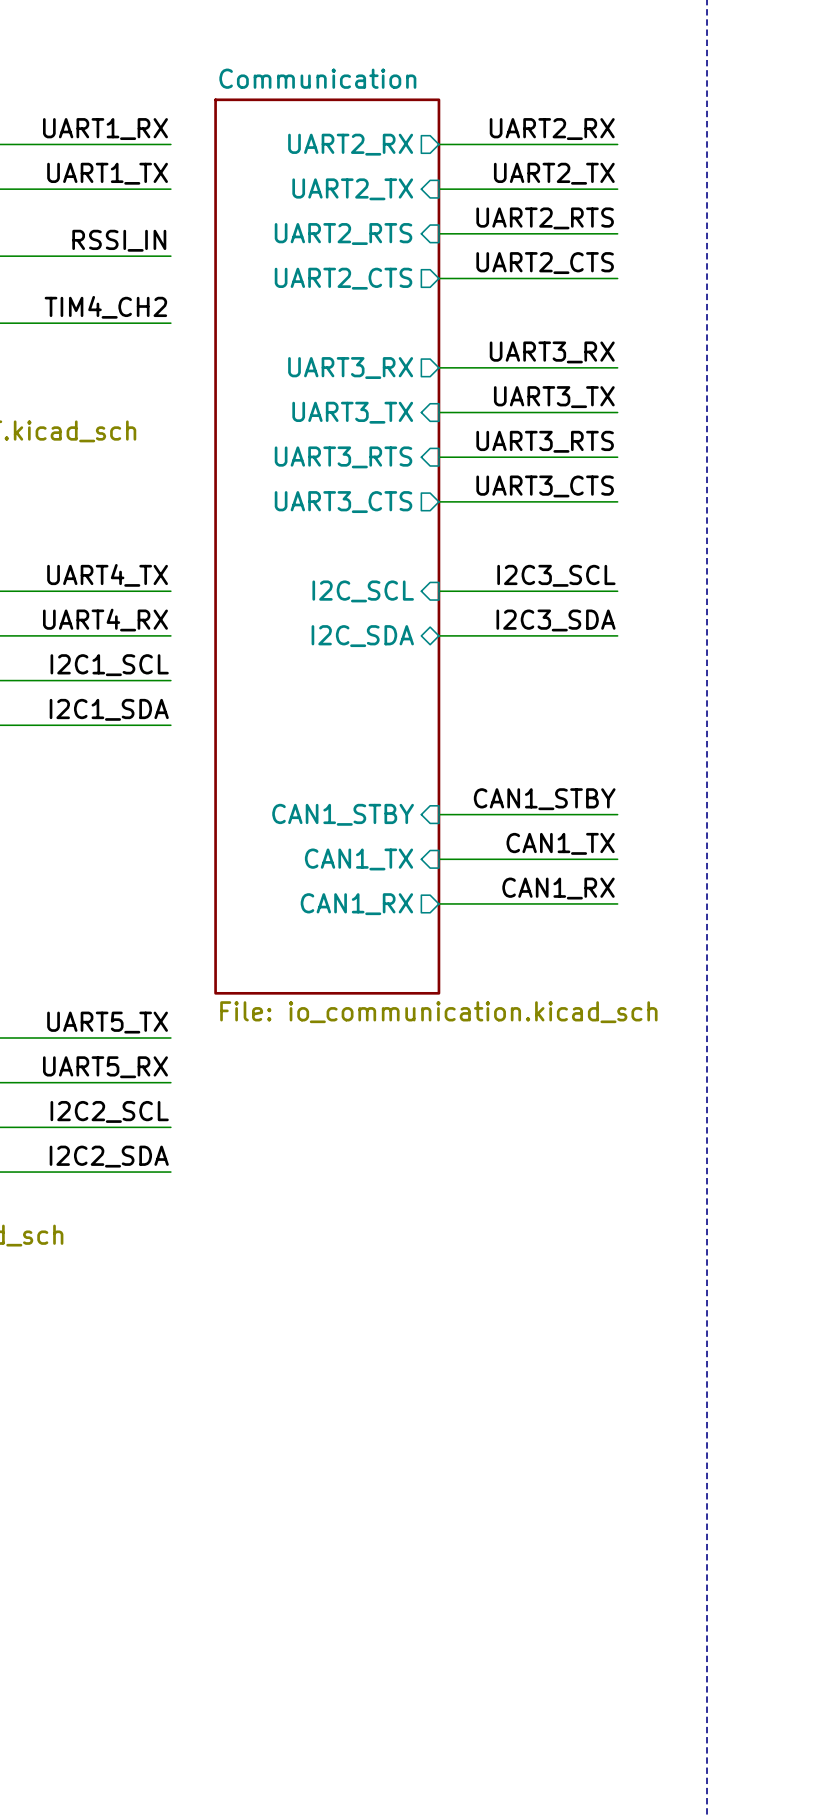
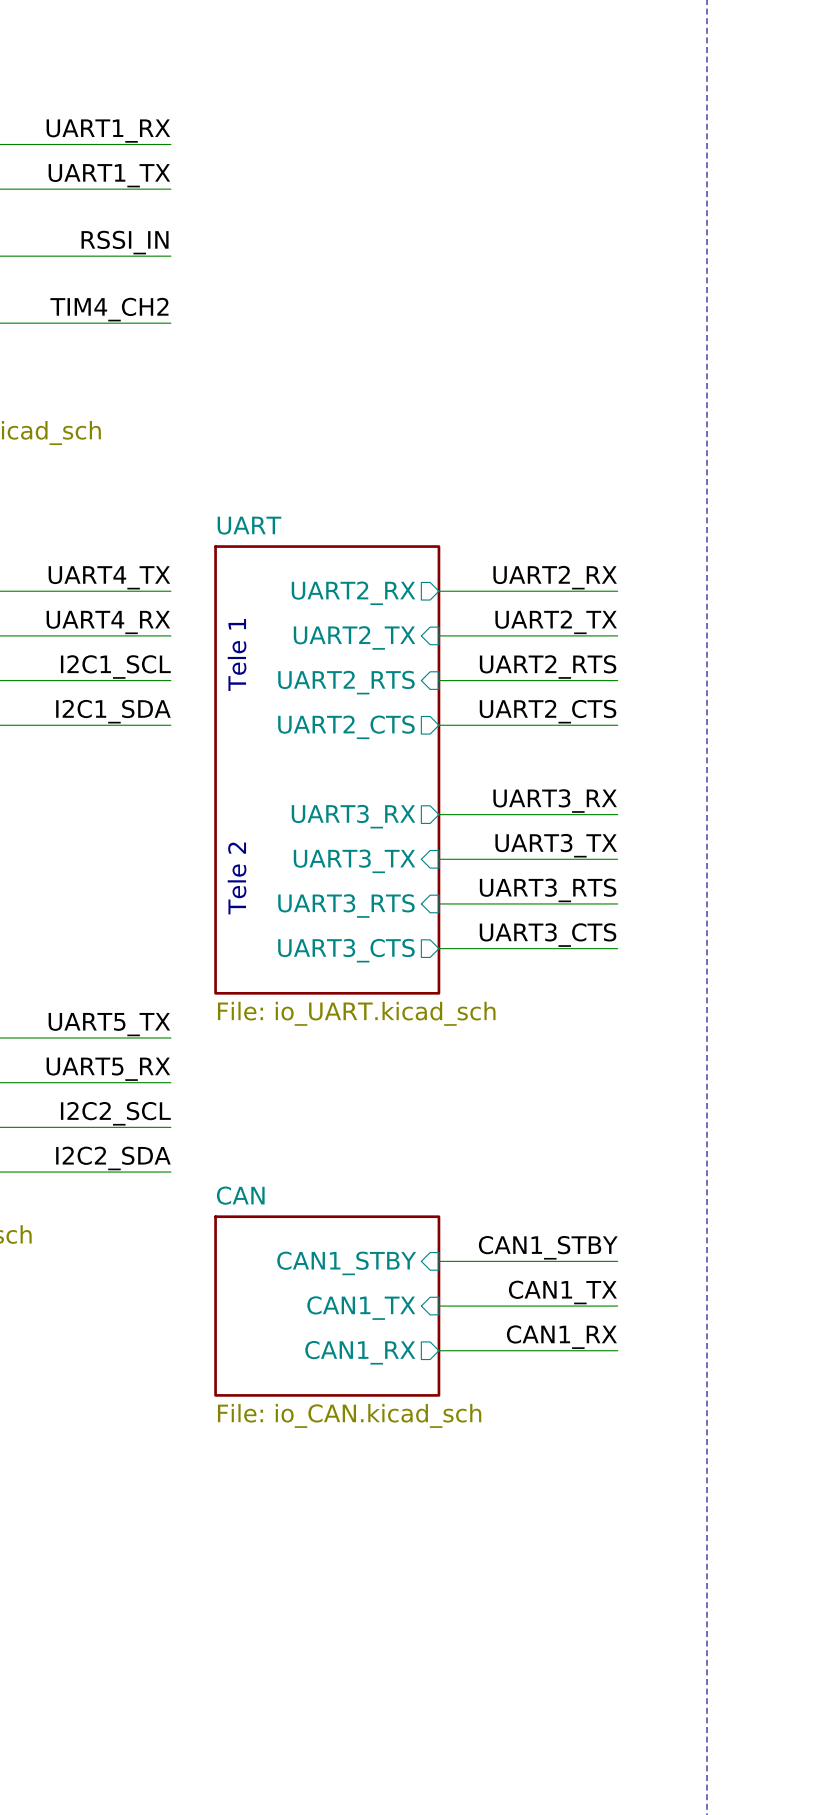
label: UART2_RX (552, 129) -> none
sheet pin: UART2_RX (350, 144) -> none
wire: (438, 144) (617, 144) -> none
label: UART2_TX (554, 173) -> none
sheet pin: UART2_TX (352, 189) -> none
wire: (438, 189) (617, 189) -> none
label: UART2_RTS (545, 218) -> none
wire: (438, 233) (617, 233) -> none
sheet pin: UART2_RTS (343, 234) -> none
label: UART2_CTS (545, 263) -> none
sheet pin: UART2_CTS (343, 278) -> none
wire: (438, 278) (617, 278) -> none
label: UART3_RX (552, 352) -> none
wire: (438, 367) (617, 367) -> none
sheet pin: UART3_RX (350, 368) -> none
label: UART3_TX (554, 397) -> none
sheet pin: UART3_TX (352, 412) -> none
wire: (438, 412) (617, 412) -> none
label: UART3_RTS (545, 441) -> none
sheet pin: UART3_RTS (343, 457) -> none
wire: (438, 457) (617, 457) -> (438, 680) (617, 680)
label: UART3_CTS (545, 486) -> none
wire: (438, 501) (617, 501) -> (438, 725) (617, 725)
sheet pin: UART3_CTS (343, 502) -> none
sheet Communication: File: io_communication.kicad_sch (327, 546) -> none
label: I2C3_SCL (556, 575) -> UART2_RX (555, 577)
sheet pin shape: input (363, 591) -> output (353, 593)
sheet pin: I2C_SCL (363, 591) -> UART2_RX (353, 593)
label: I2C3_SDA (556, 620) -> UART2_TX (556, 622)
sheet pin shape: bidirectional (362, 636) -> input (354, 637)
sheet pin: I2C_SDA (362, 636) -> UART2_TX (354, 637)
text: none -> Tele 1 (237, 655)
label: none -> UART2_RTS (548, 667)
sheet pin: none -> UART2_RTS (346, 682)
label: none -> UART2_CTS (548, 711)
sheet pin: none -> UART2_CTS (346, 727)
sheet UART: none -> File: io_UART.kicad_sch (327, 769)
label: CAN1_STBY (544, 799) -> UART3_RX (555, 801)
sheet pin shape: input (343, 814) -> output (353, 816)
sheet pin: CAN1_STBY (343, 814) -> UART3_RX (353, 816)
label: CAN1_TX (560, 843) -> UART3_TX (556, 845)
sheet pin: CAN1_TX (359, 859) -> UART3_TX (354, 861)
text: none -> Tele 2 (237, 878)
label: CAN1_RX (558, 888) -> UART3_RTS (548, 890)
sheet pin shape: output (356, 904) -> input (346, 905)
sheet pin: CAN1_RX (356, 904) -> UART3_RTS (346, 905)
label: none -> UART3_CTS (548, 935)
sheet pin: none -> UART3_CTS (346, 950)
wire: none -> (438, 948) (617, 948)
label: none -> CAN1_STBY (548, 1247)
sheet pin: none -> CAN1_STBY (346, 1263)
wire: none -> (438, 1261) (617, 1261)
label: none -> CAN1_TX (562, 1292)
sheet CAN: none -> File: io_CAN.kicad_sch (327, 1306)
sheet pin: none -> CAN1_TX (361, 1308)
wire: none -> (438, 1306) (617, 1306)
label: none -> CAN1_RX (561, 1337)
sheet pin: none -> CAN1_RX (360, 1352)
wire: none -> (438, 1350) (617, 1350)

